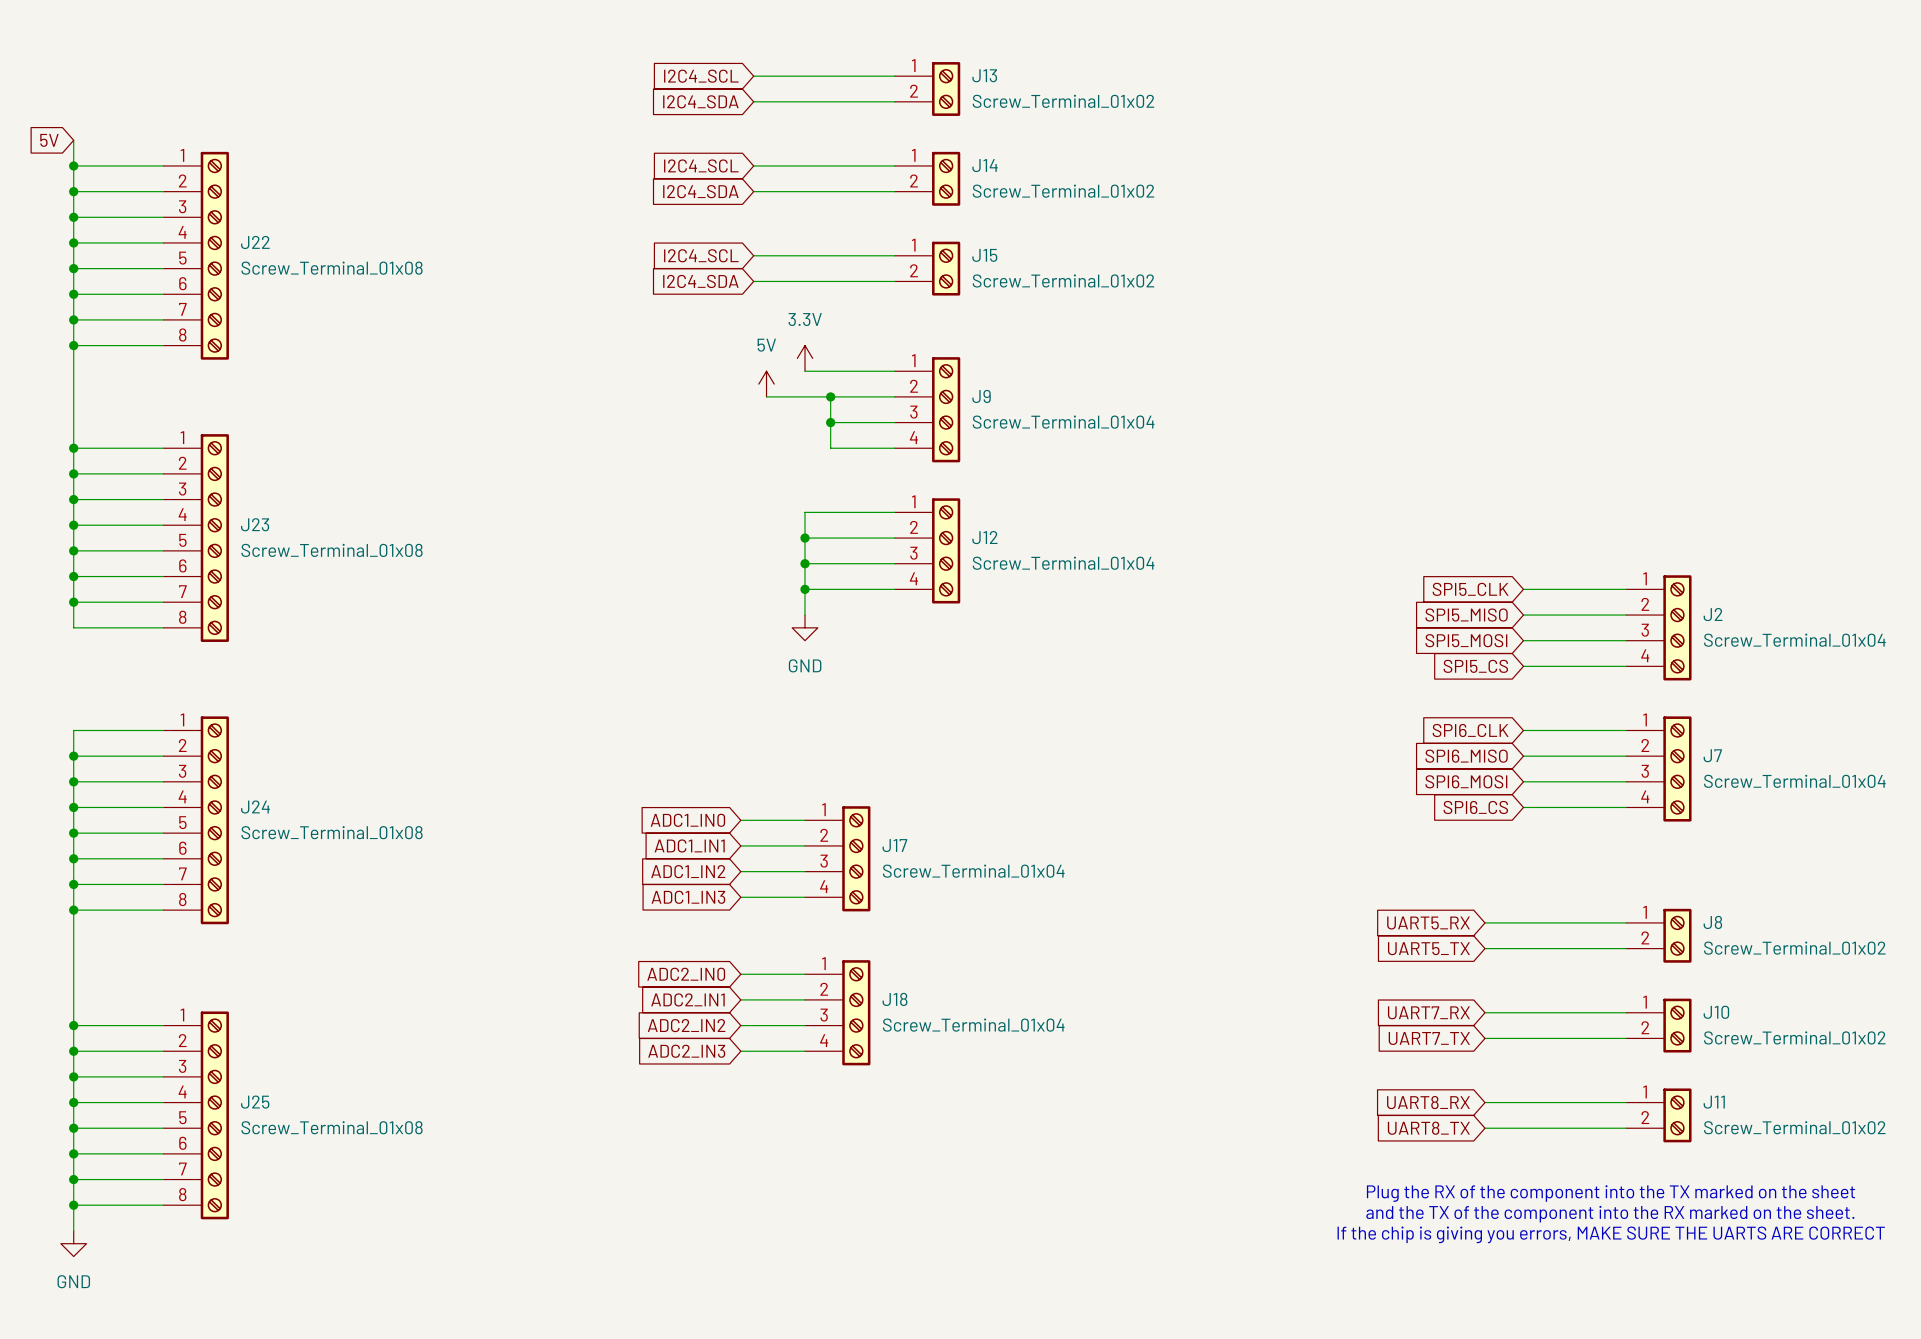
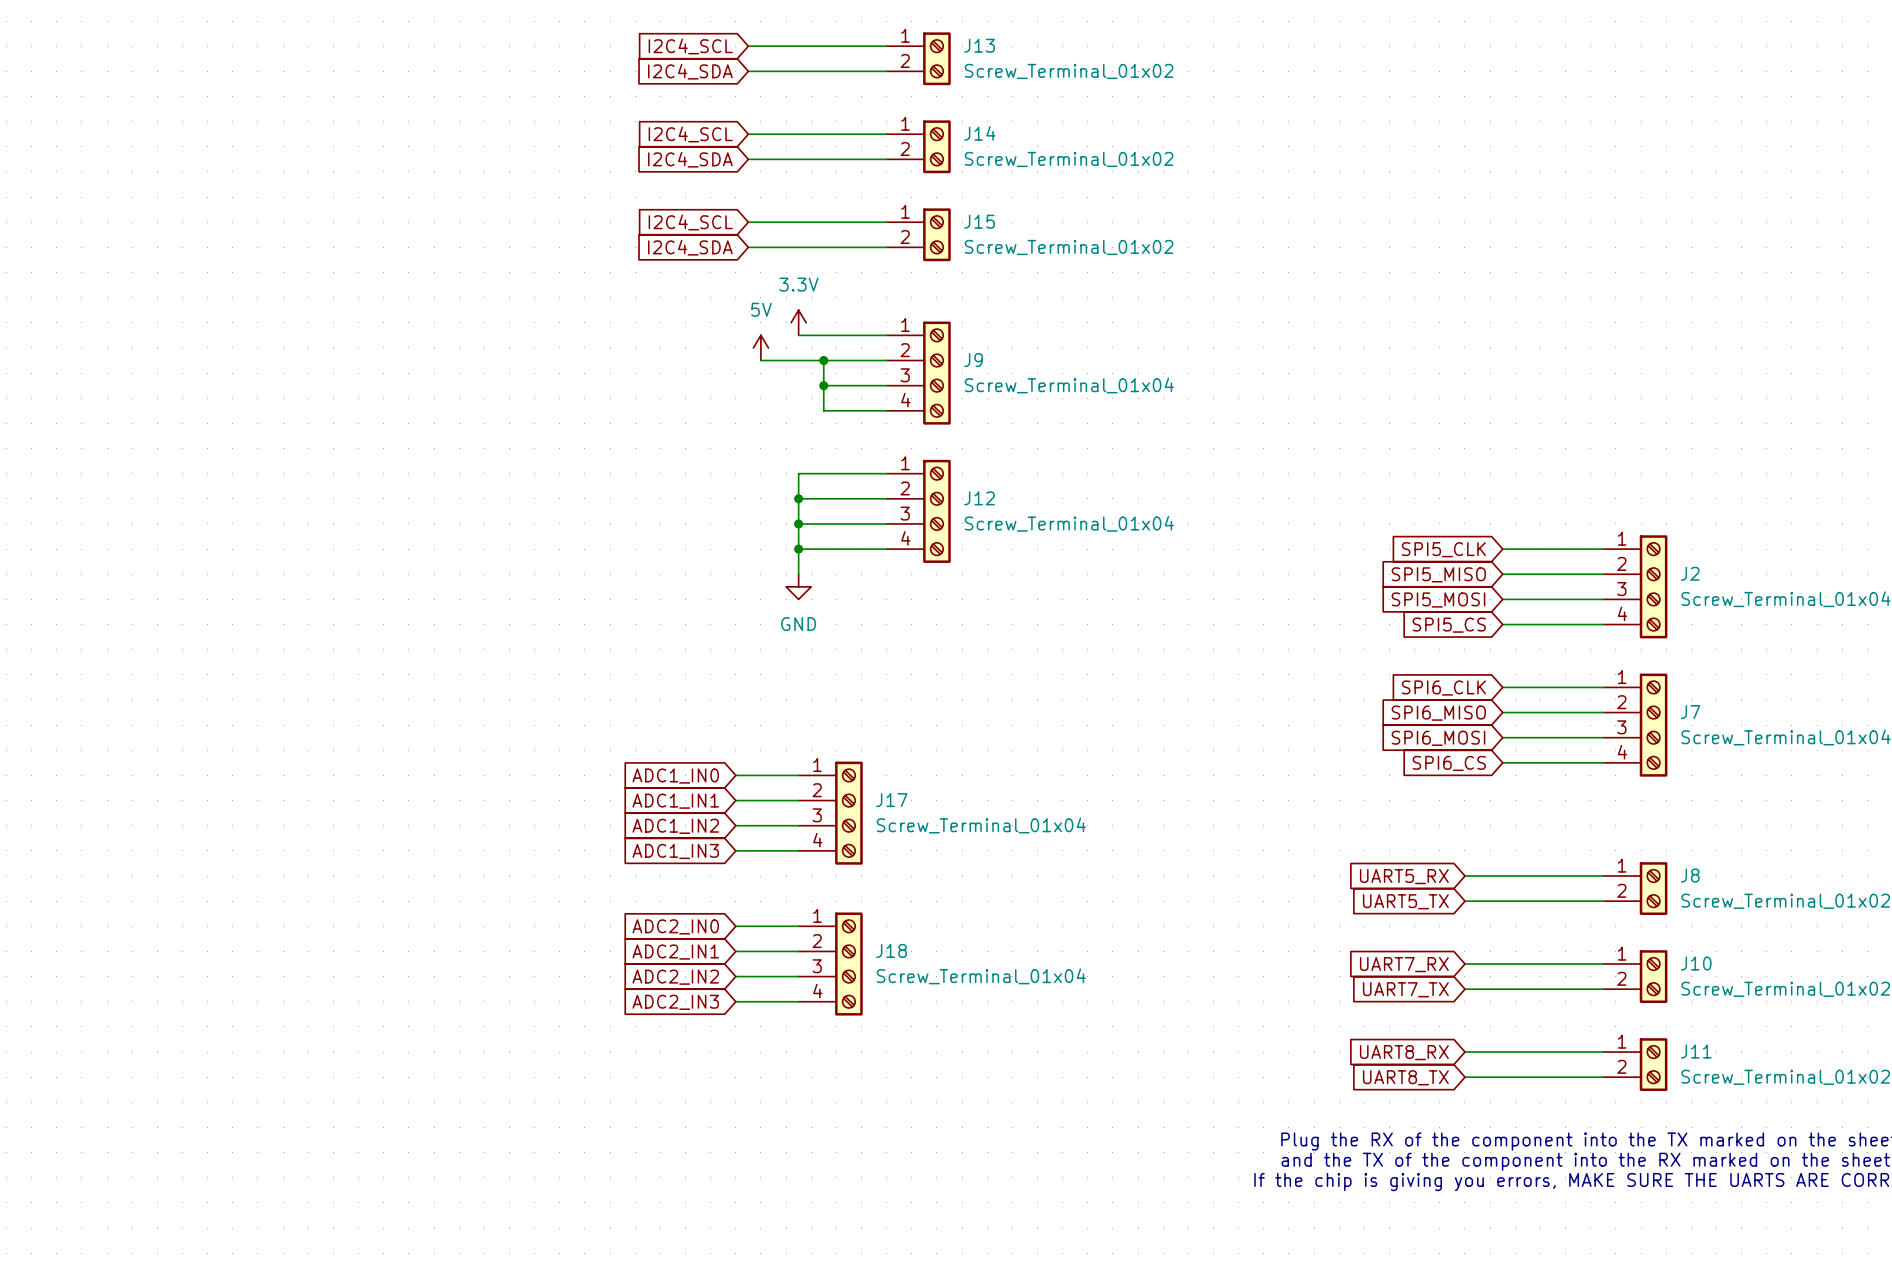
global label: 5V (49, 140) -> none
wire: (73, 140) (73, 627) (163, 627) -> none
wire: (73, 165) (163, 165) -> none
junction: (73, 165) -> none
wire: (73, 191) (163, 191) -> none
junction: (73, 191) -> none
wire: (73, 217) (163, 217) -> none
junction: (73, 217) -> none
wire: (73, 242) (163, 242) -> none
junction: (73, 242) -> none
J22: Screw_Terminal_01x08 (196, 255) -> none
wire: (73, 268) (163, 268) -> none
junction: (73, 268) -> none
wire: (73, 294) (163, 294) -> none
junction: (73, 294) -> none
wire: (73, 319) (163, 319) -> none
junction: (73, 319) -> none
wire: (73, 345) (163, 345) -> none
junction: (73, 345) -> none
wire: (73, 448) (163, 448) -> none
junction: (73, 448) -> none
wire: (73, 473) (163, 473) -> none
junction: (73, 473) -> none
wire: (73, 499) (163, 499) -> none
junction: (73, 499) -> none
wire: (73, 525) (163, 525) -> none
junction: (73, 525) -> none
J23: Screw_Terminal_01x08 (196, 538) -> none
wire: (73, 550) (163, 550) -> none
junction: (73, 550) -> none
wire: (73, 576) (163, 576) -> none
junction: (73, 576) -> none
wire: (73, 602) (163, 602) -> none
junction: (73, 602) -> none
wire: (163, 730) (73, 730) (73, 1230) -> none
wire: (73, 756) (163, 756) -> none
junction: (73, 756) -> none
wire: (73, 781) (163, 781) -> none
junction: (73, 781) -> none
wire: (73, 807) (163, 807) -> none
junction: (73, 807) -> none
J24: Screw_Terminal_01x08 (196, 820) -> none
wire: (73, 833) (163, 833) -> none
junction: (73, 833) -> none
wire: (73, 858) (163, 858) -> none
junction: (73, 858) -> none
wire: (73, 884) (163, 884) -> none
junction: (73, 884) -> none
wire: (73, 910) (163, 910) -> none
junction: (73, 910) -> none
wire: (73, 1025) (163, 1025) -> none
junction: (73, 1025) -> none
wire: (73, 1051) (163, 1051) -> none
junction: (73, 1051) -> none
wire: (73, 1076) (163, 1076) -> none
junction: (73, 1076) -> none
wire: (73, 1102) (163, 1102) -> none
junction: (73, 1102) -> none
J25: Screw_Terminal_01x08 (196, 1115) -> none
wire: (73, 1128) (163, 1128) -> none
junction: (73, 1128) -> none
wire: (73, 1153) (163, 1153) -> none
junction: (73, 1153) -> none
wire: (73, 1179) (163, 1179) -> none
junction: (73, 1179) -> none
wire: (73, 1205) (163, 1205) -> none
junction: (73, 1205) -> none
power symbol: GND (73, 1243) -> none

